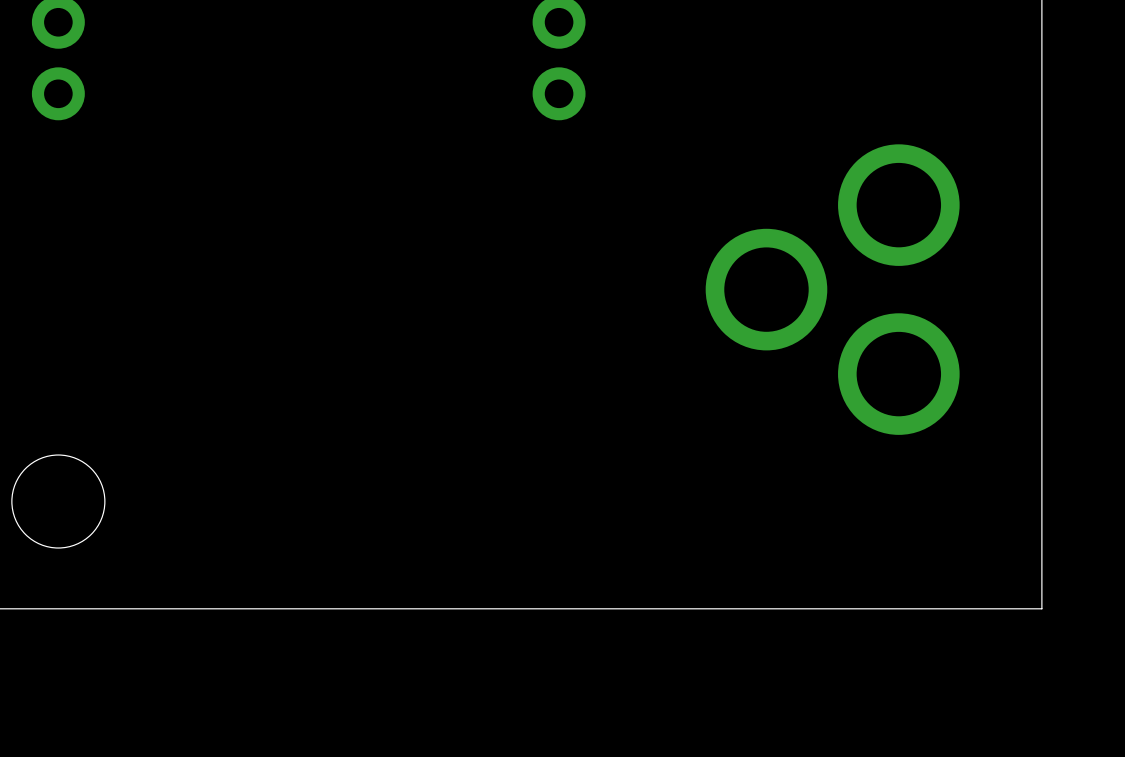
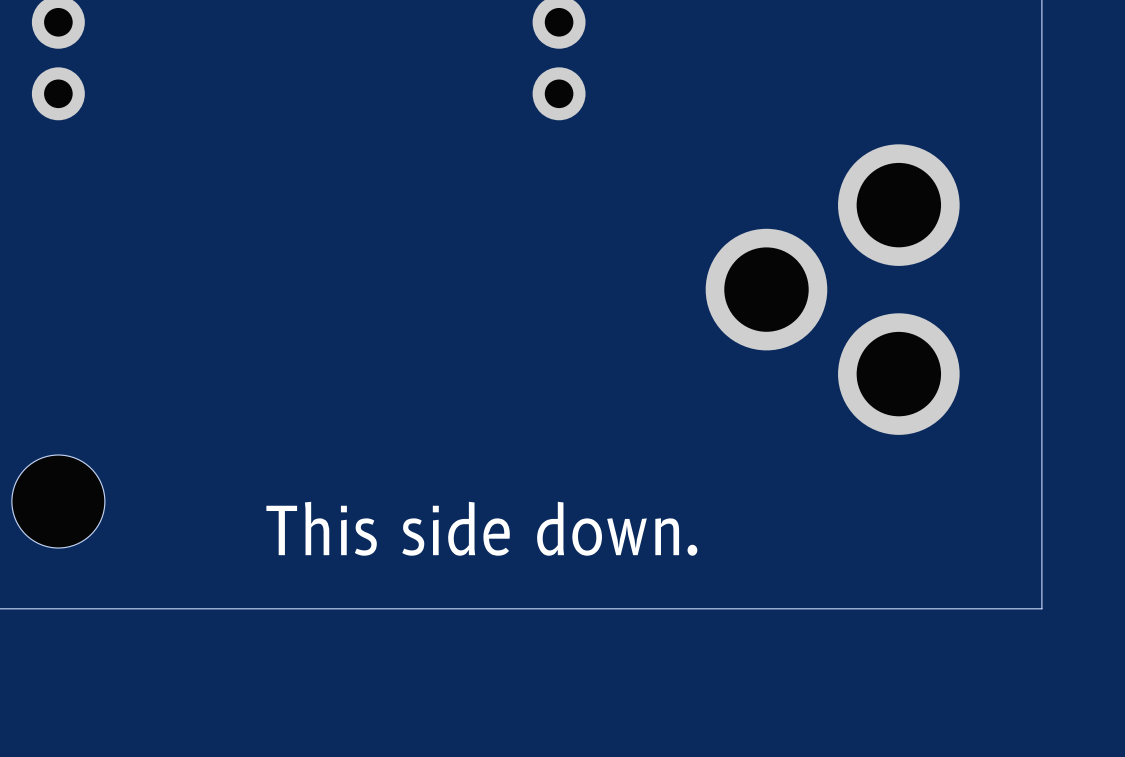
text: none -> This side down. (481, 528)

